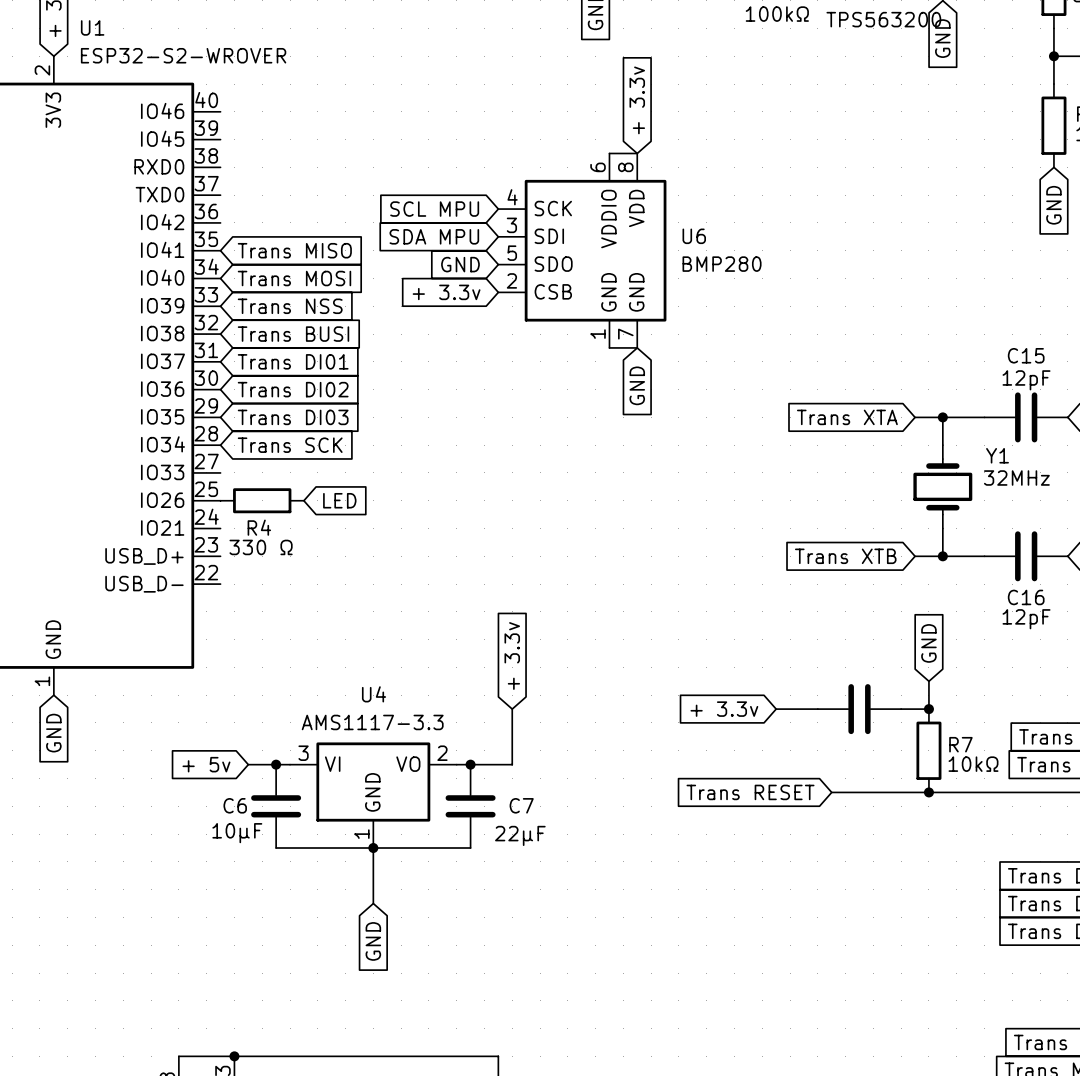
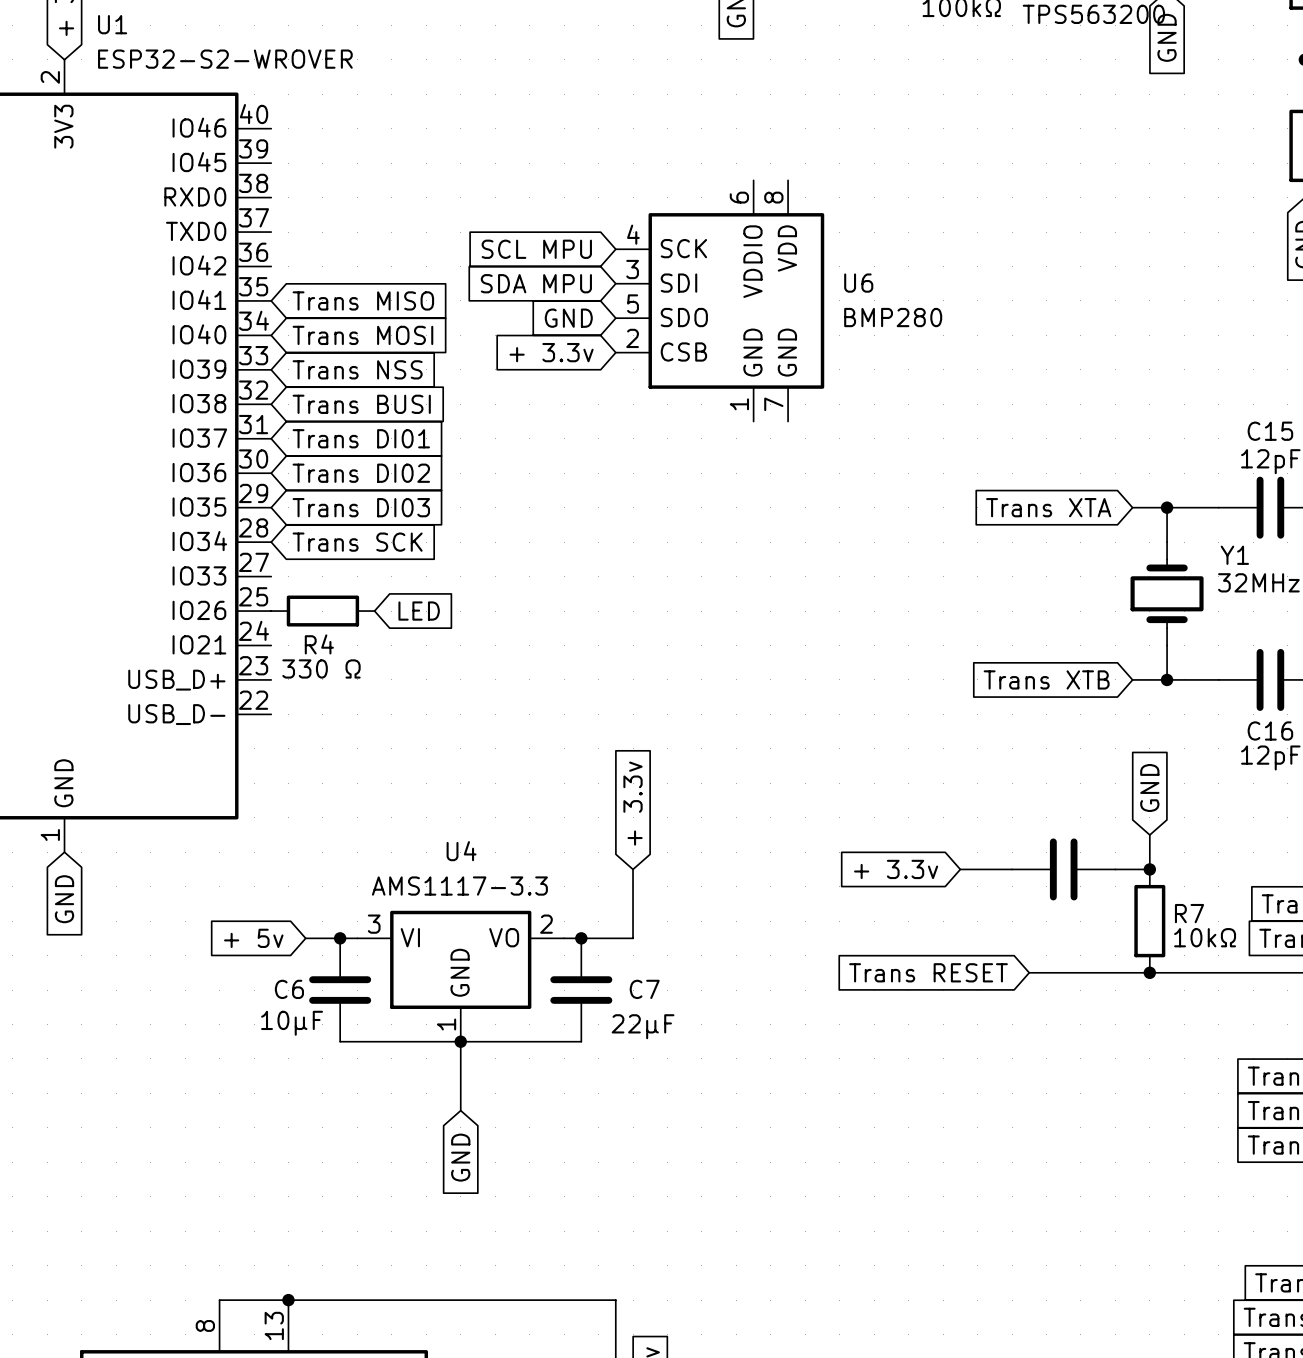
global label: + 3.3v (637, 100) -> none
wire: (609, 153) (637, 153) -> none
wire: (609, 347) (637, 347) -> none
global label: GND (637, 385) -> none

